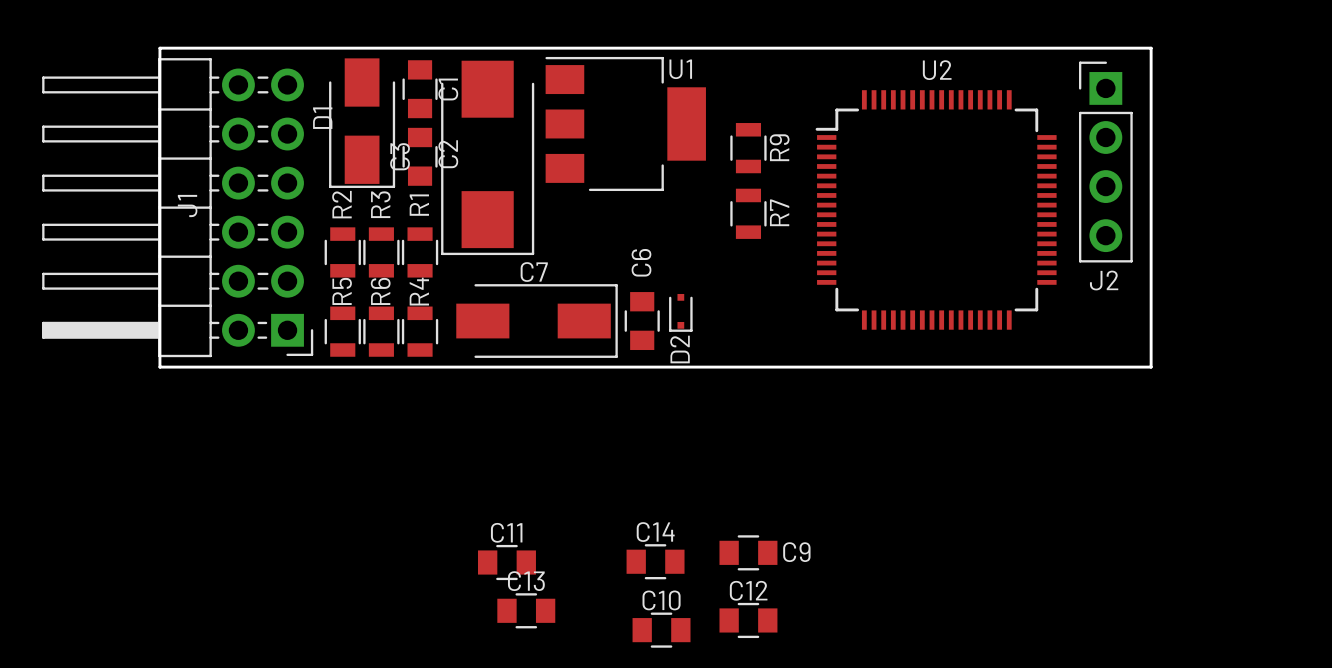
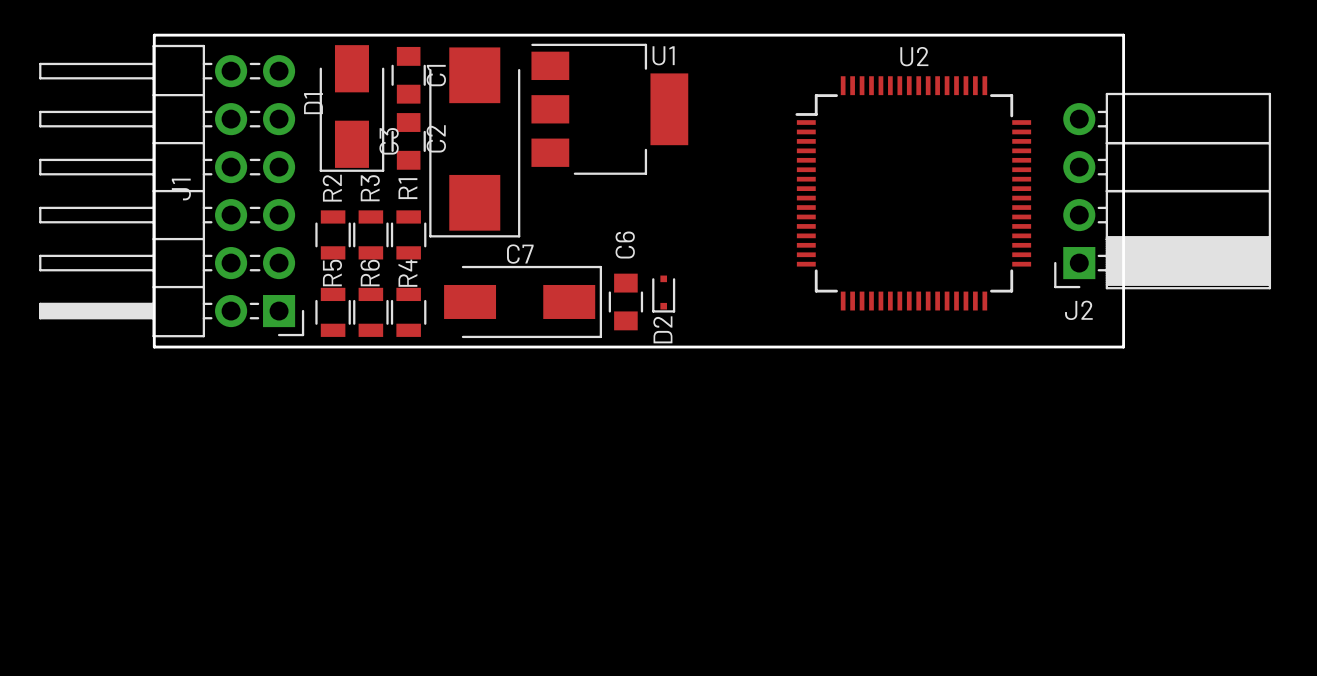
J2 footprint: [1078, 61, 1133, 263] -> [1054, 92, 1272, 290]
R9: (748, 148) -> none
R7: (748, 213) -> none
J2 name position: J2 (1104, 280) -> J2 (1078, 310)
C9: (748, 552) -> none
C14: (655, 561) -> none
C11: (506, 562) -> none
C13: (526, 610) -> none
C12: (748, 620) -> none
C10: (661, 630) -> none

